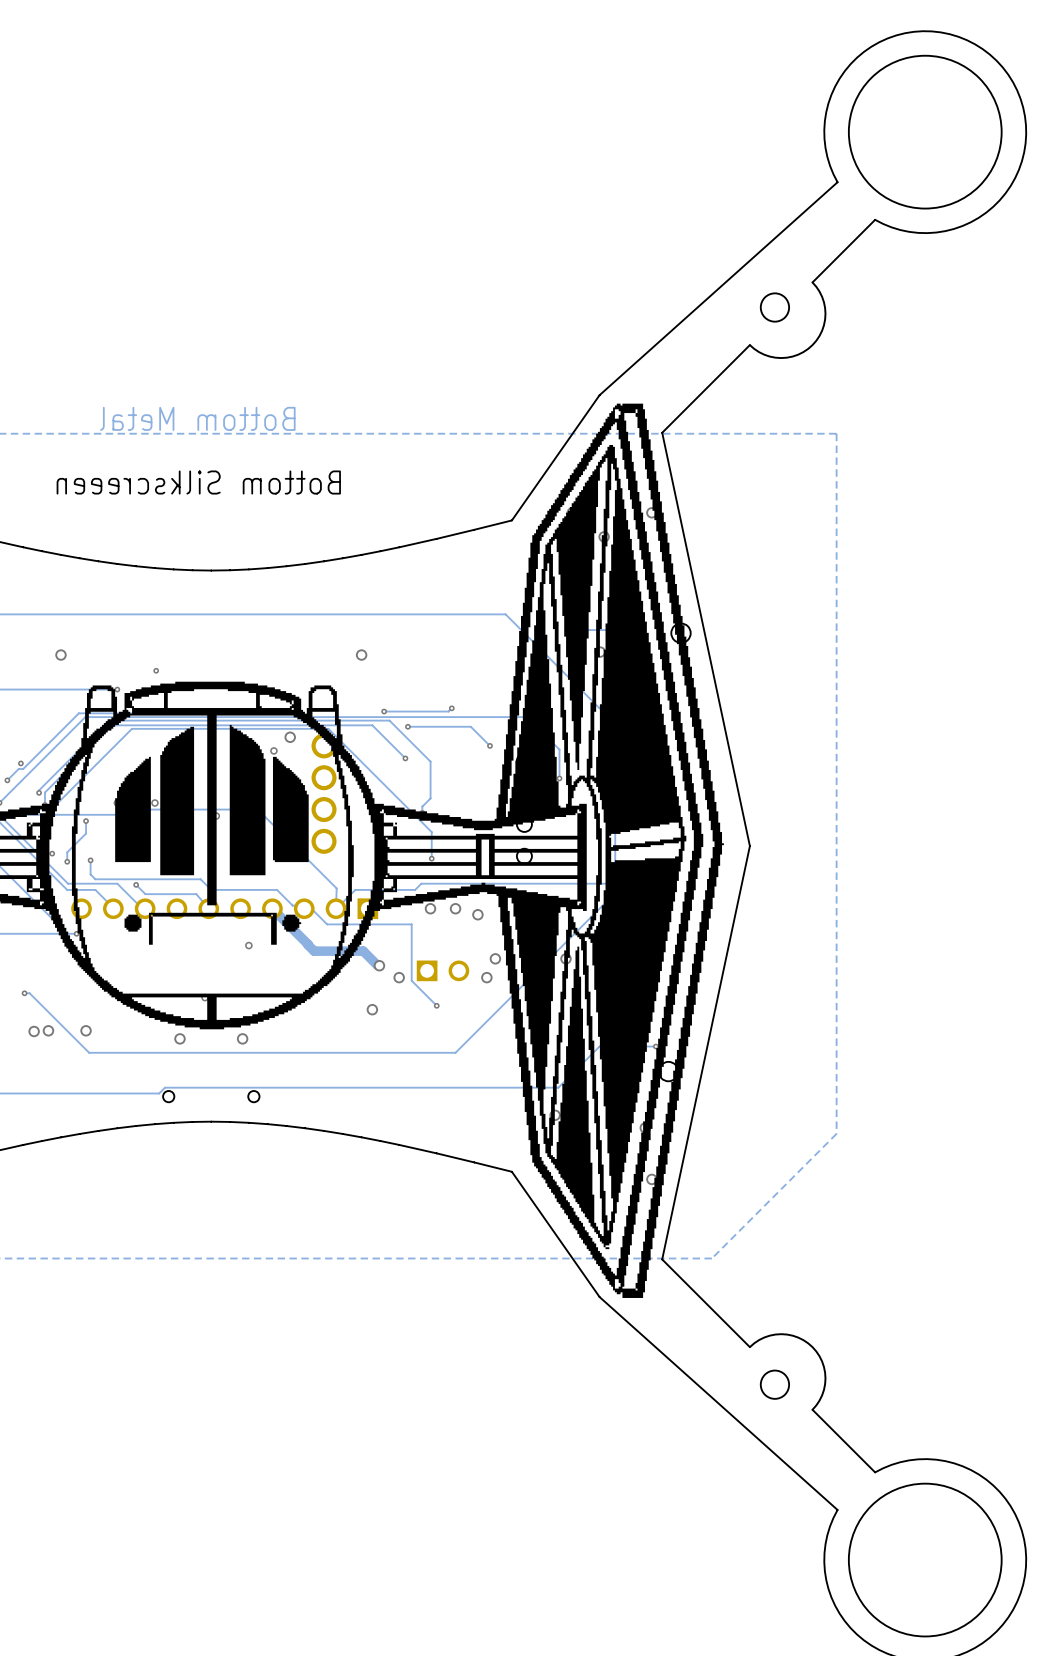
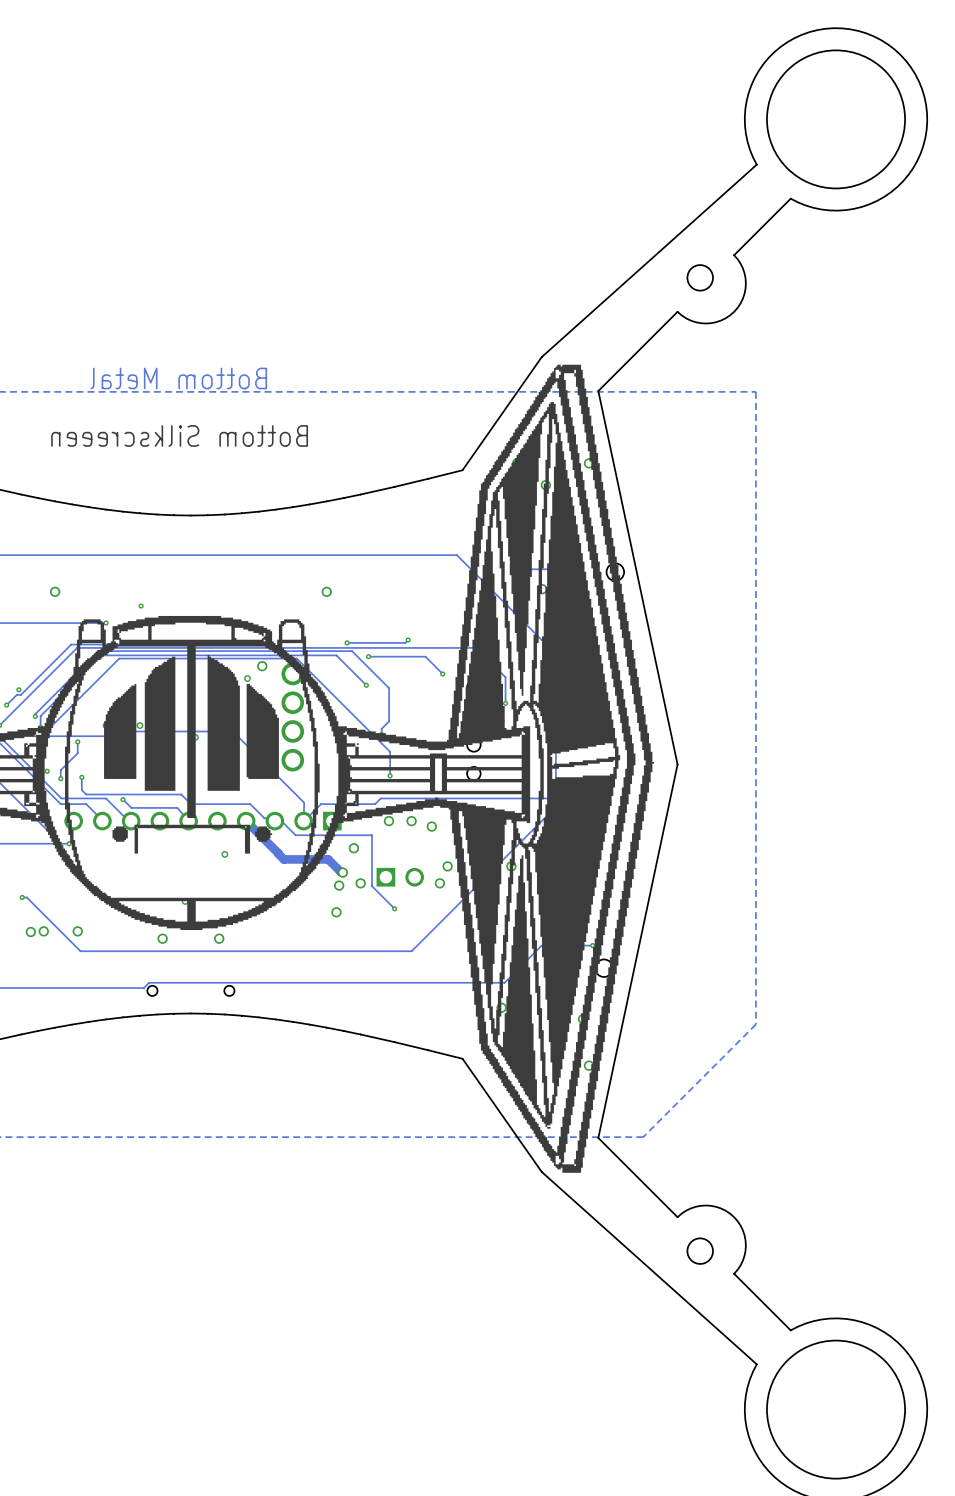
via: none -> (353, 848)
via: none -> (339, 885)

